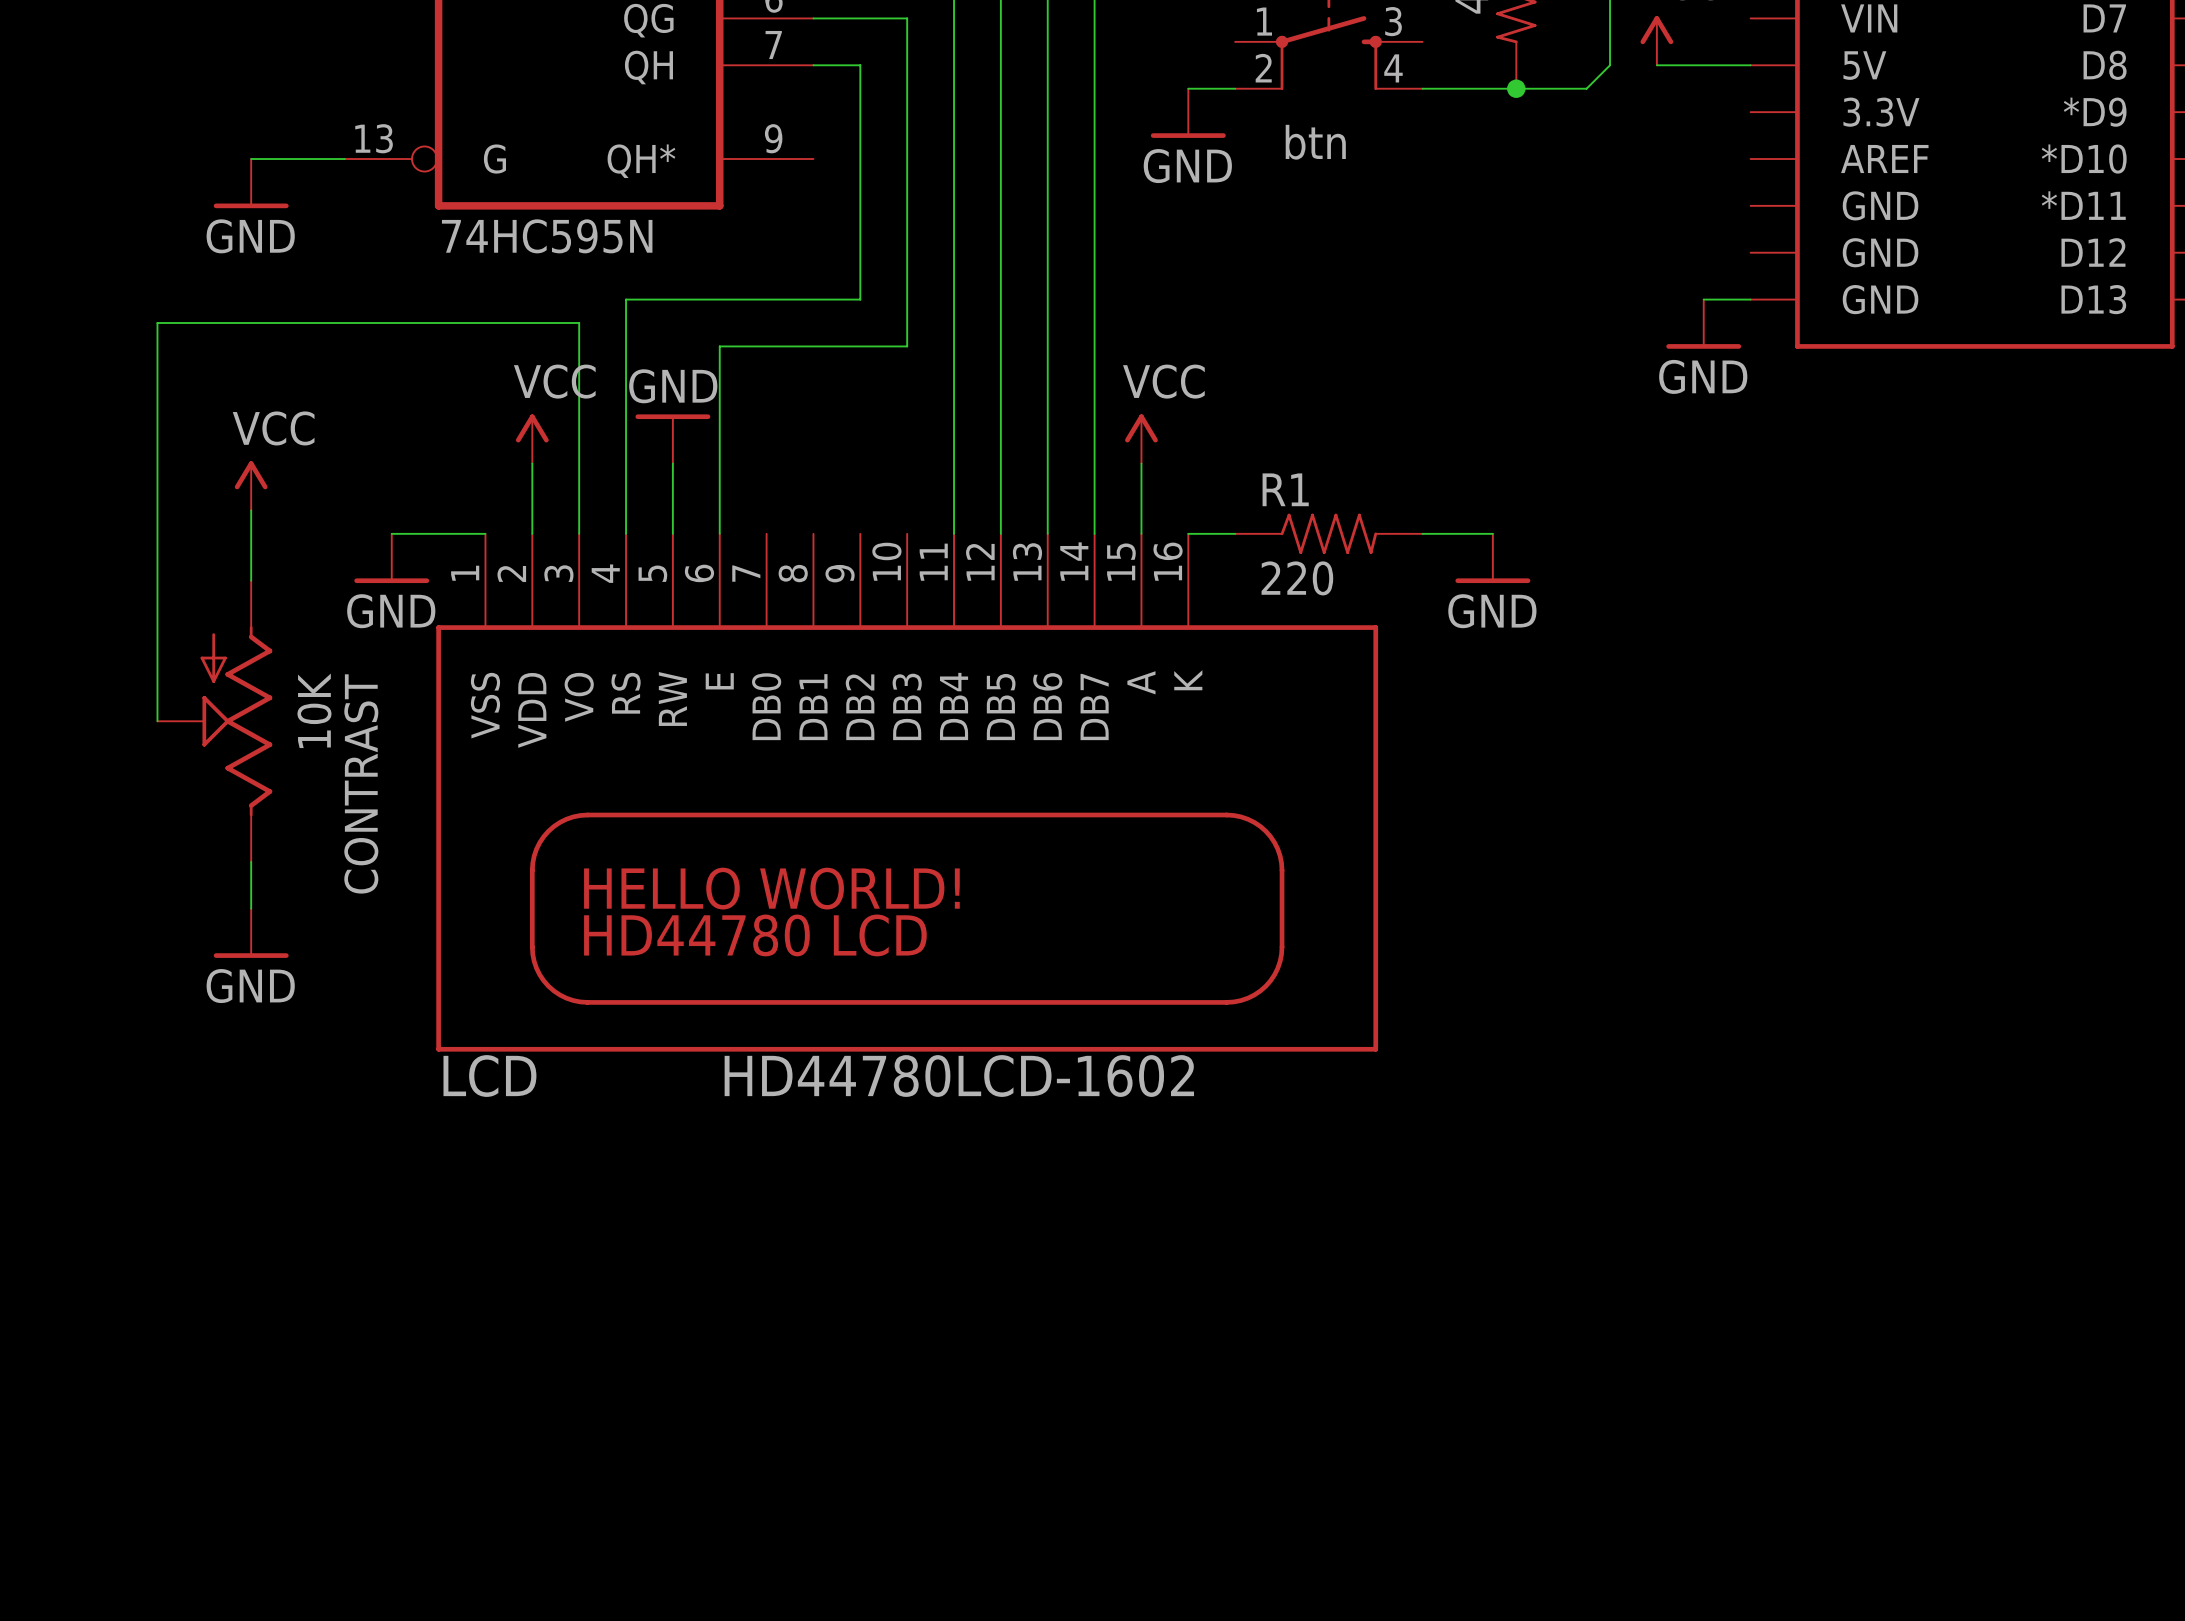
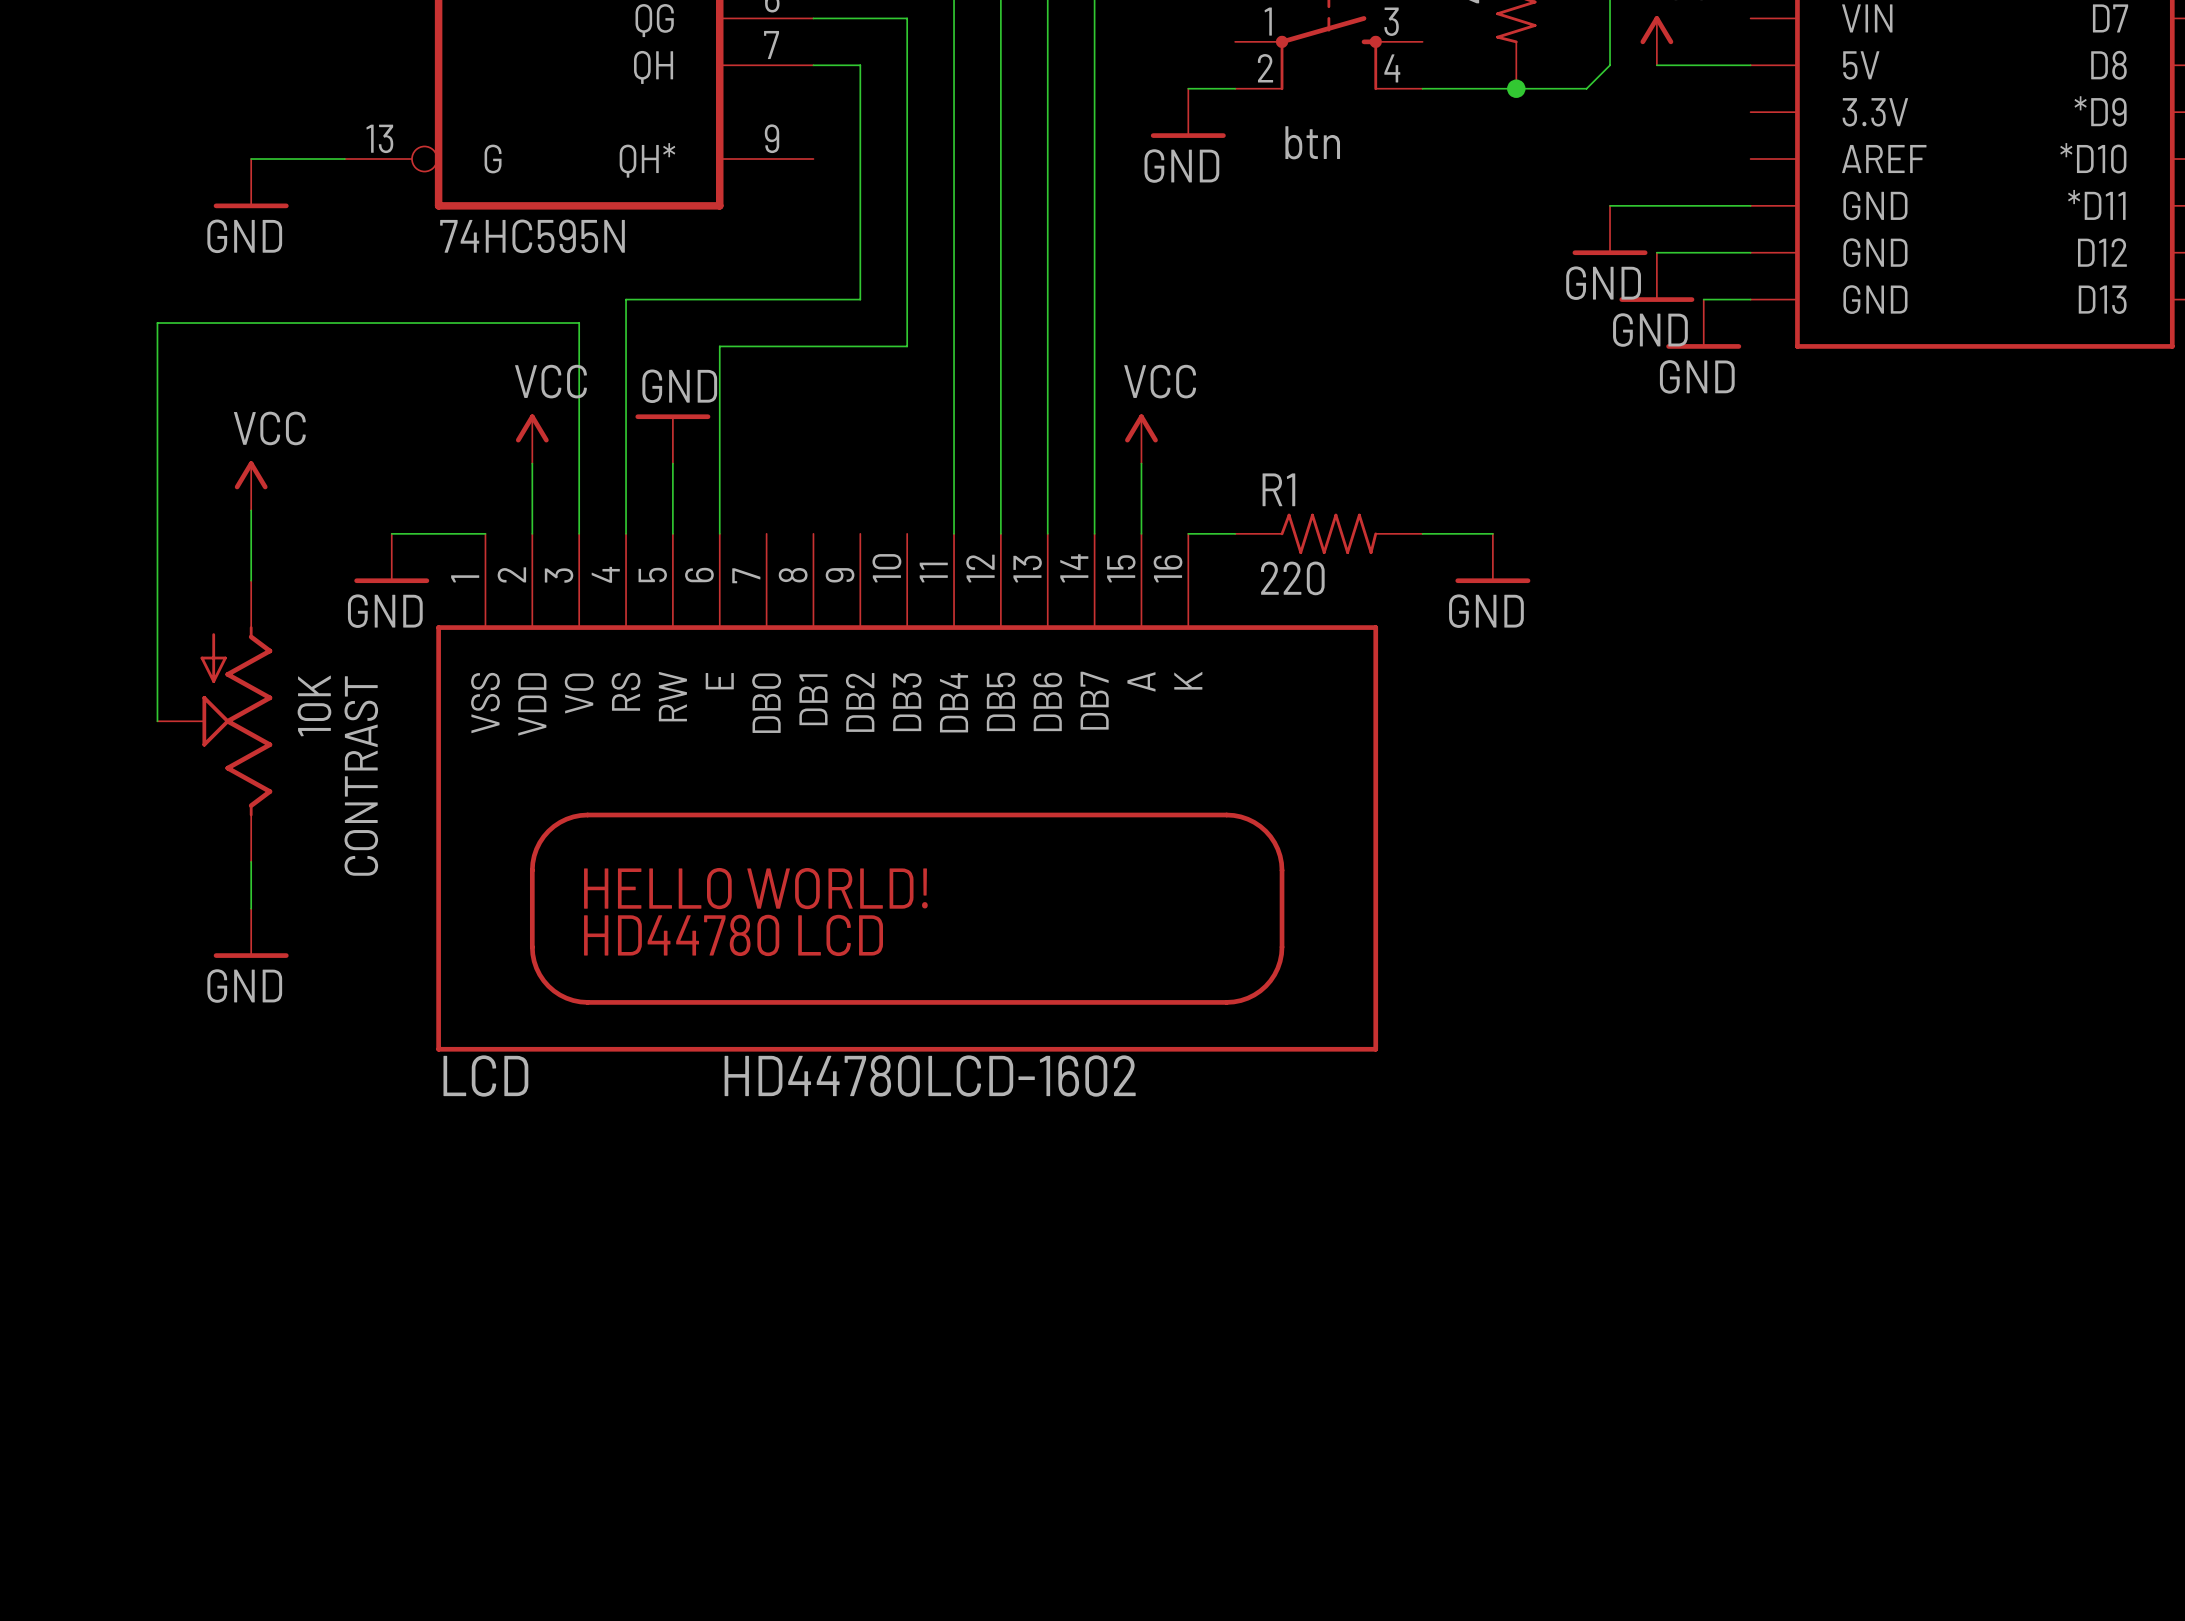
wire: none -> (1610, 205) (1750, 205)
power symbol: none -> GND (1610, 230)
wire: none -> (1656, 252) (1750, 252)
power symbol: none -> GND (1656, 277)

